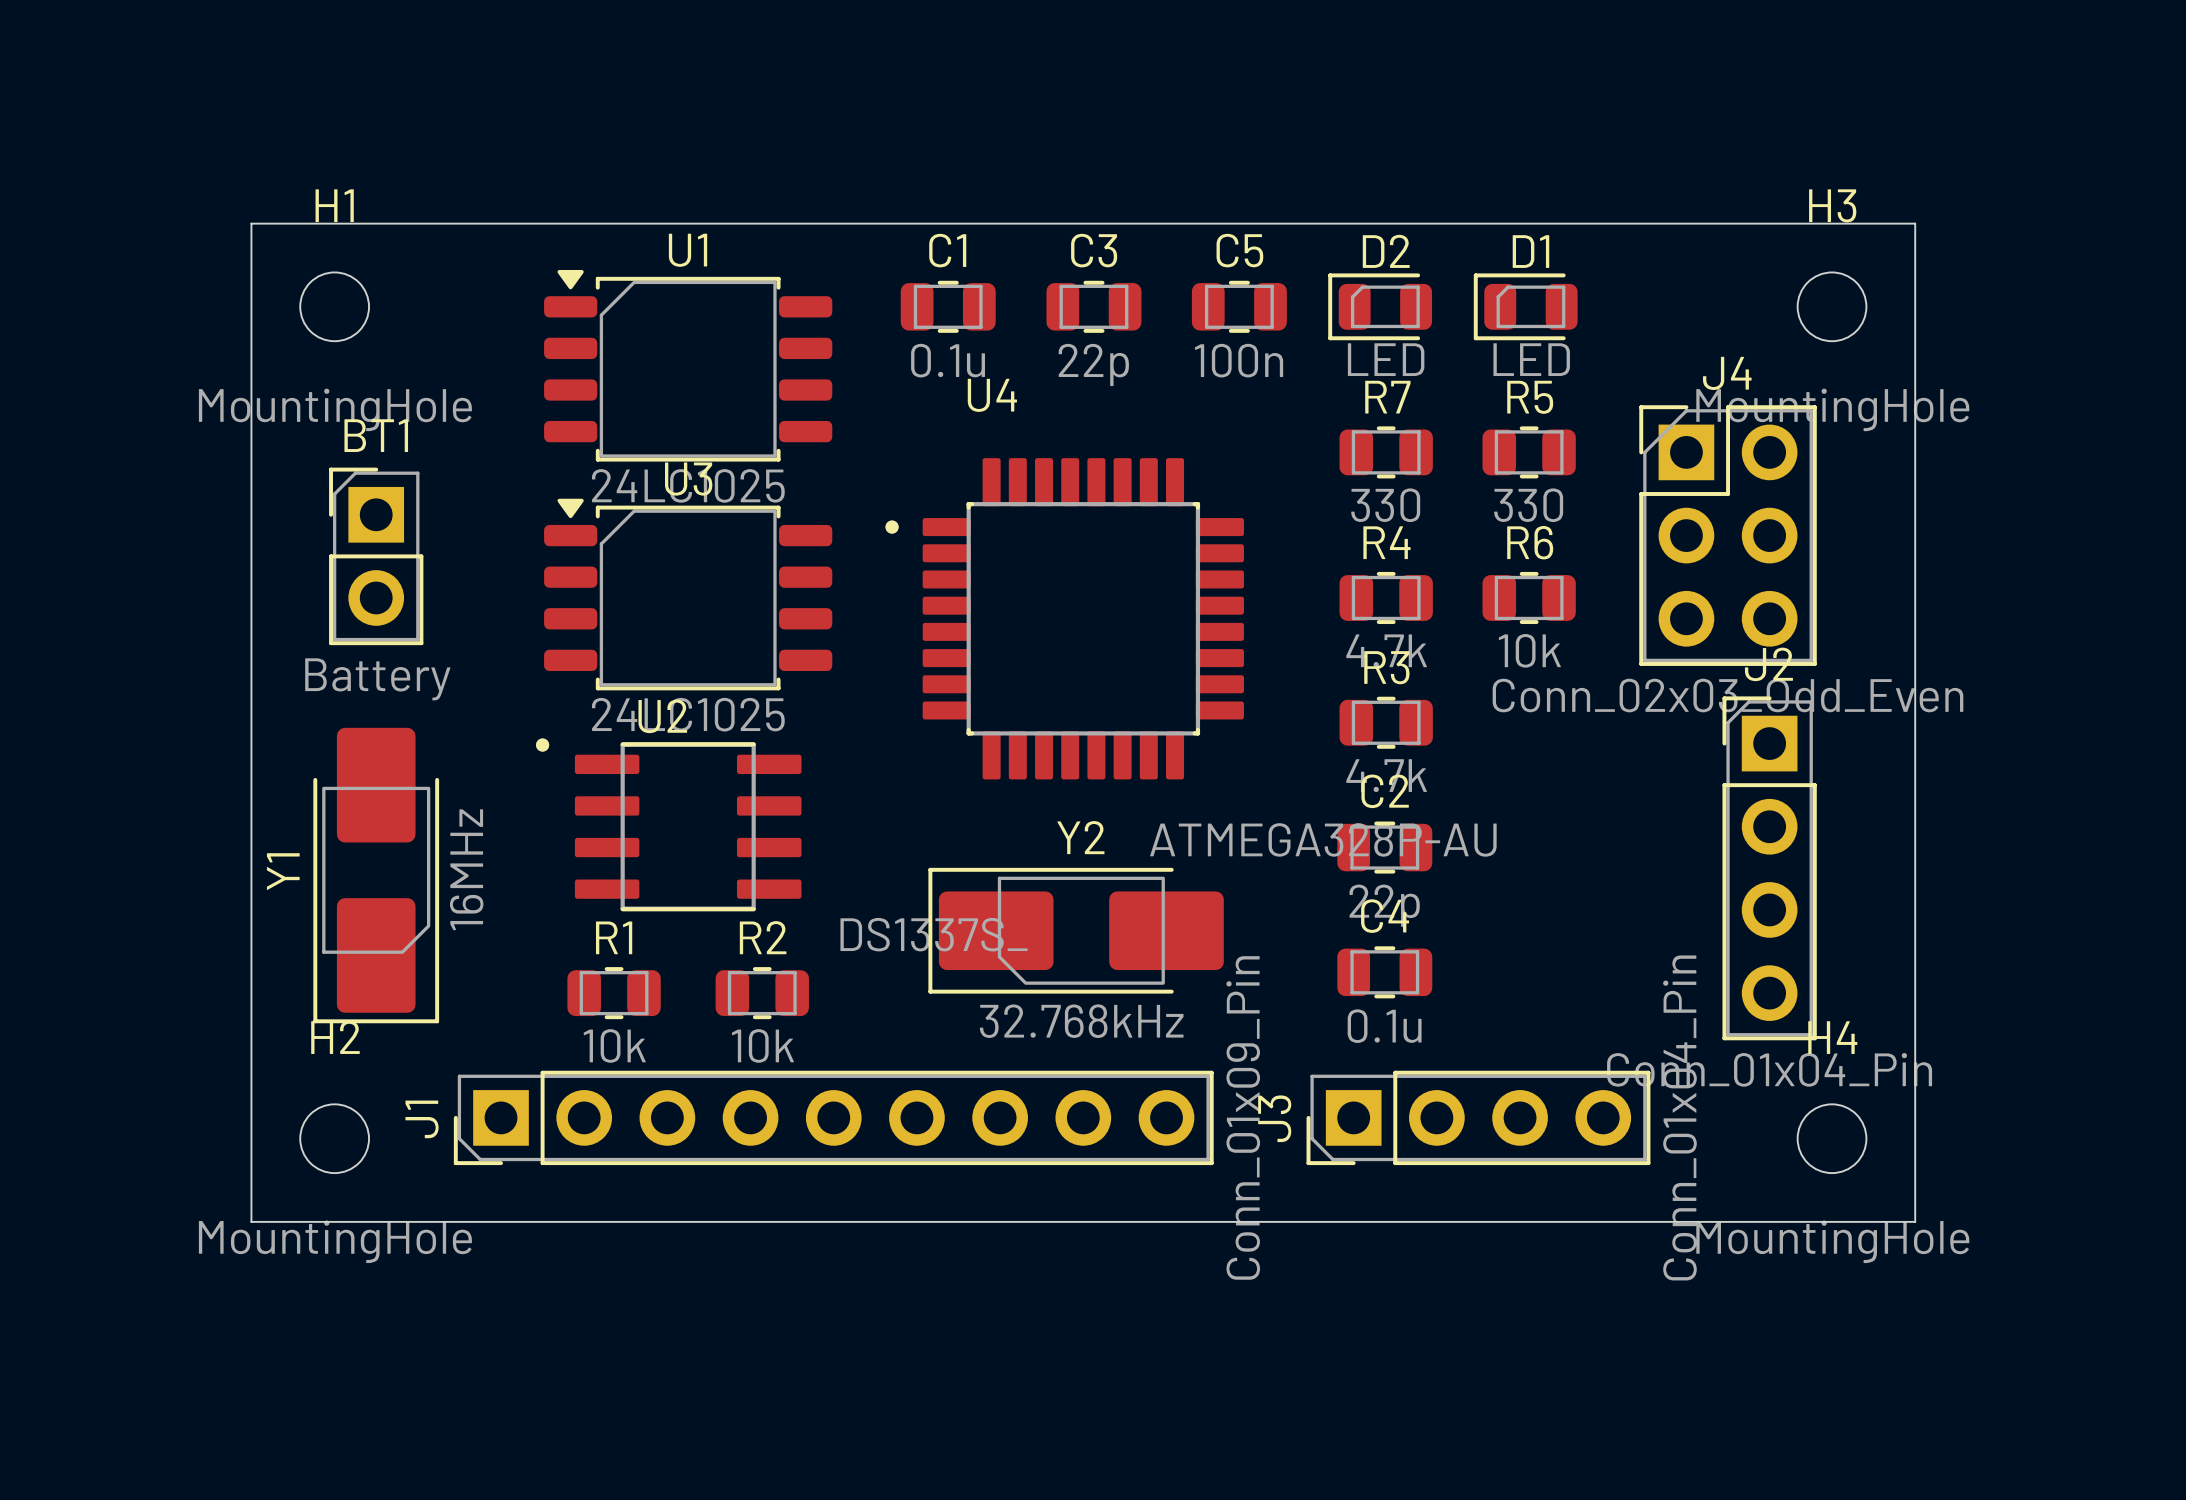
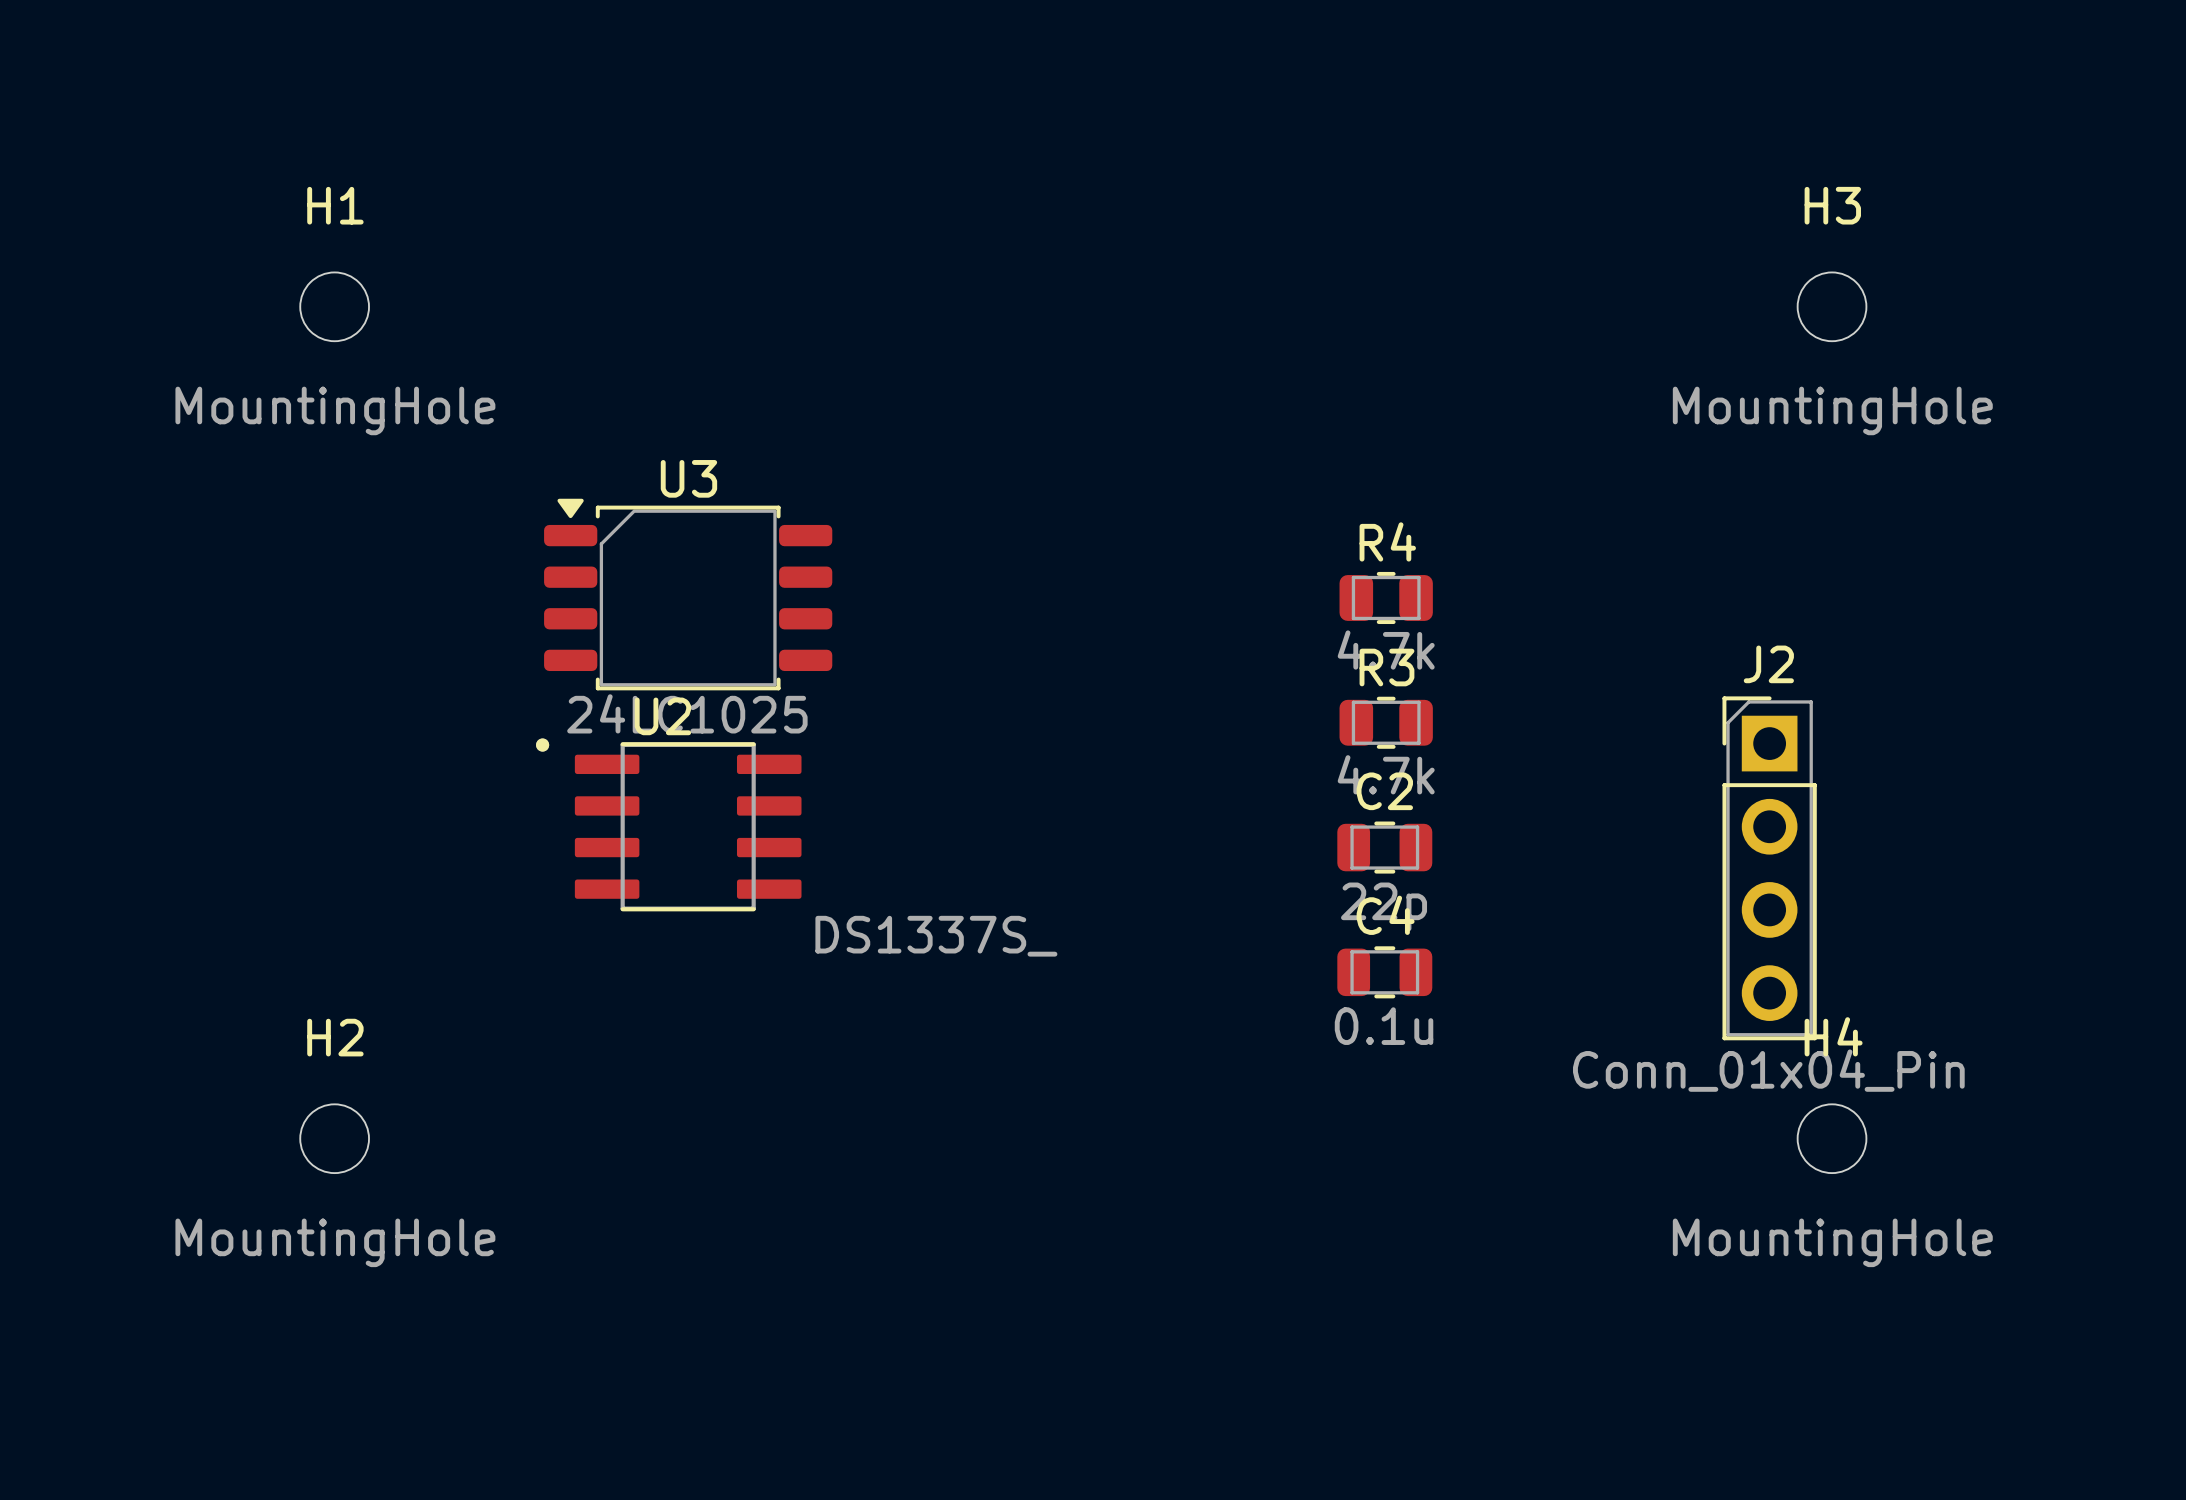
board edge: (251, 223) (1915, 223) (1915, 1221) (251, 1221) (251, 223) -> none
C1: 0.1u (948, 306) -> none
C3: 22p (1093, 306) -> none
C5: 100n (1239, 306) -> none
D2: LED (1380, 306) -> none
D1: LED (1525, 306) -> none
U1: 24LC1025 (688, 365) -> none
R7: 330 (1386, 452) -> none
R5: 330 (1529, 452) -> none
J4: Conn_02x03_Odd_Even (1728, 535) -> none
BT1: Battery (376, 556) -> none
R6: 10k (1529, 597) -> none
U4: ATMEGA328P-AU (1064, 618) -> none
Y1: 16MHz (376, 875) -> none
Y2: 32.768kHz (1076, 930) -> none
R1: 10k (614, 993) -> none
R2: 10k (762, 993) -> none
J1: Conn_01x09_Pin (833, 1117) -> none
J3: Conn_01x04_Pin (1478, 1117) -> none

